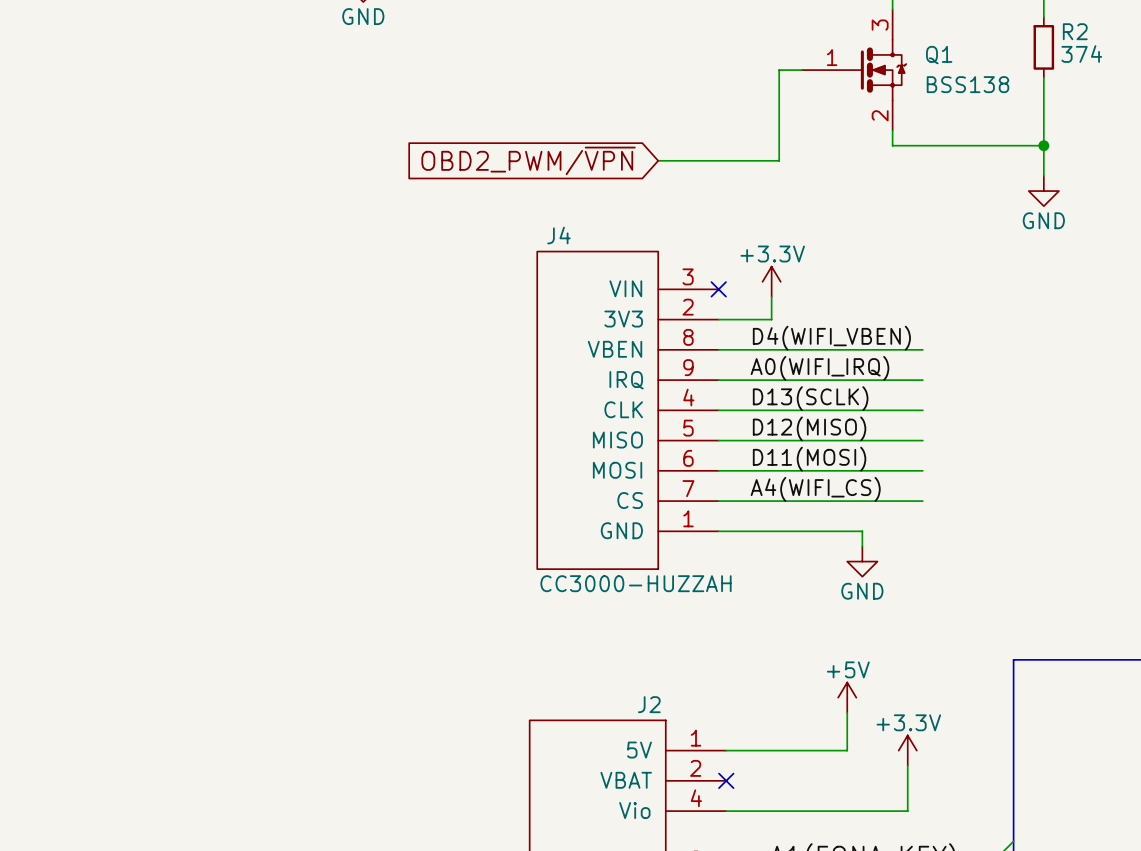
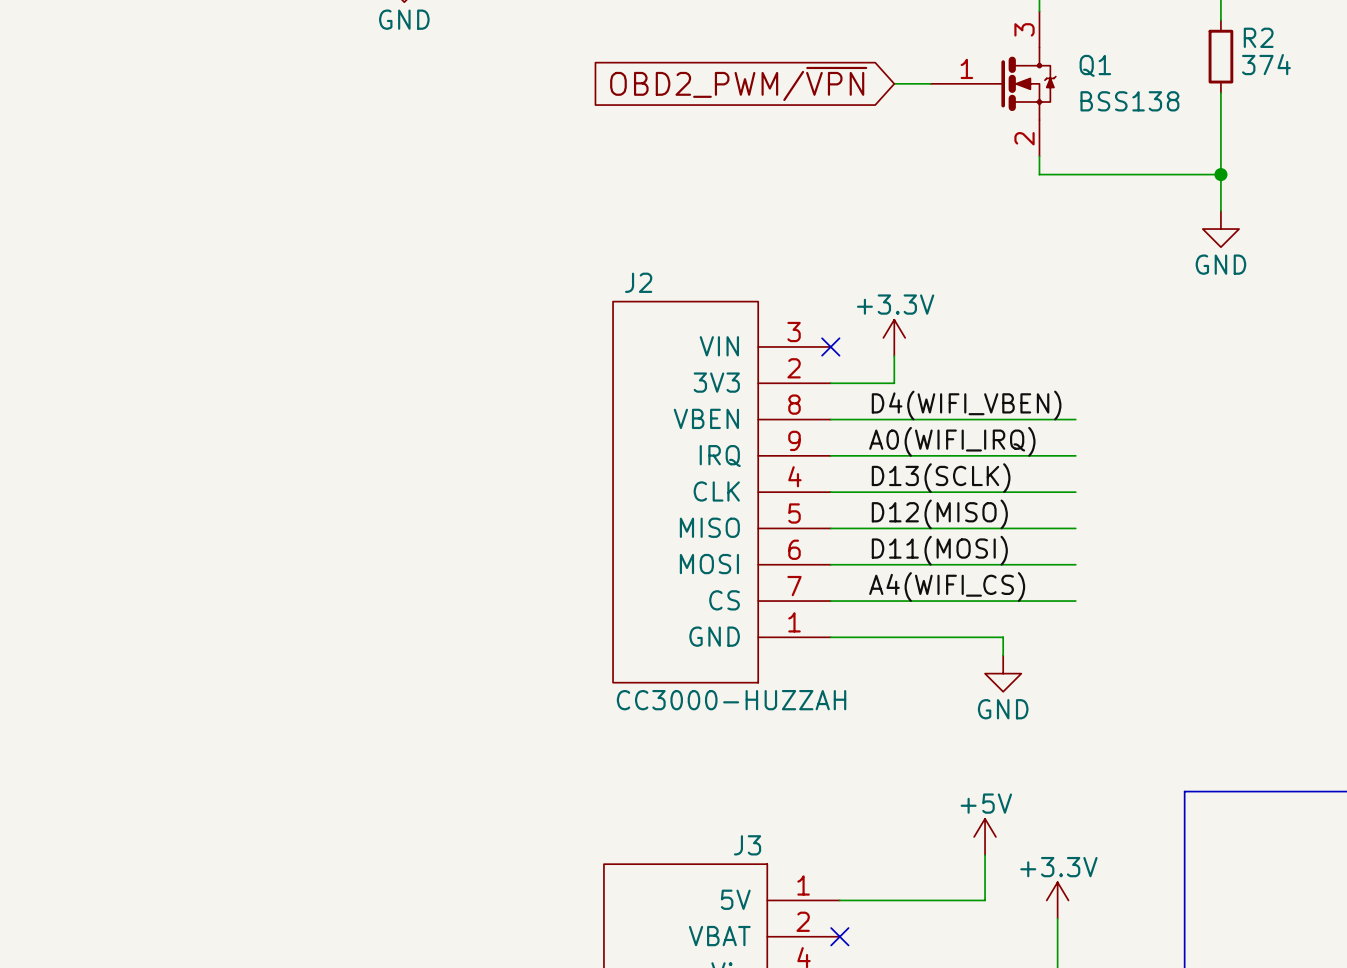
wire: (779, 70) (779, 160) (658, 160) -> (903, 83) (894, 83)
global label position: OBD2_PWM/~{VPN} (528, 160) -> OBD2_PWM/~{VPN} (738, 83)
J4 name: J4 (558, 235) -> J2 (638, 282)
J2 name: J2 (649, 704) -> J3 (747, 845)

